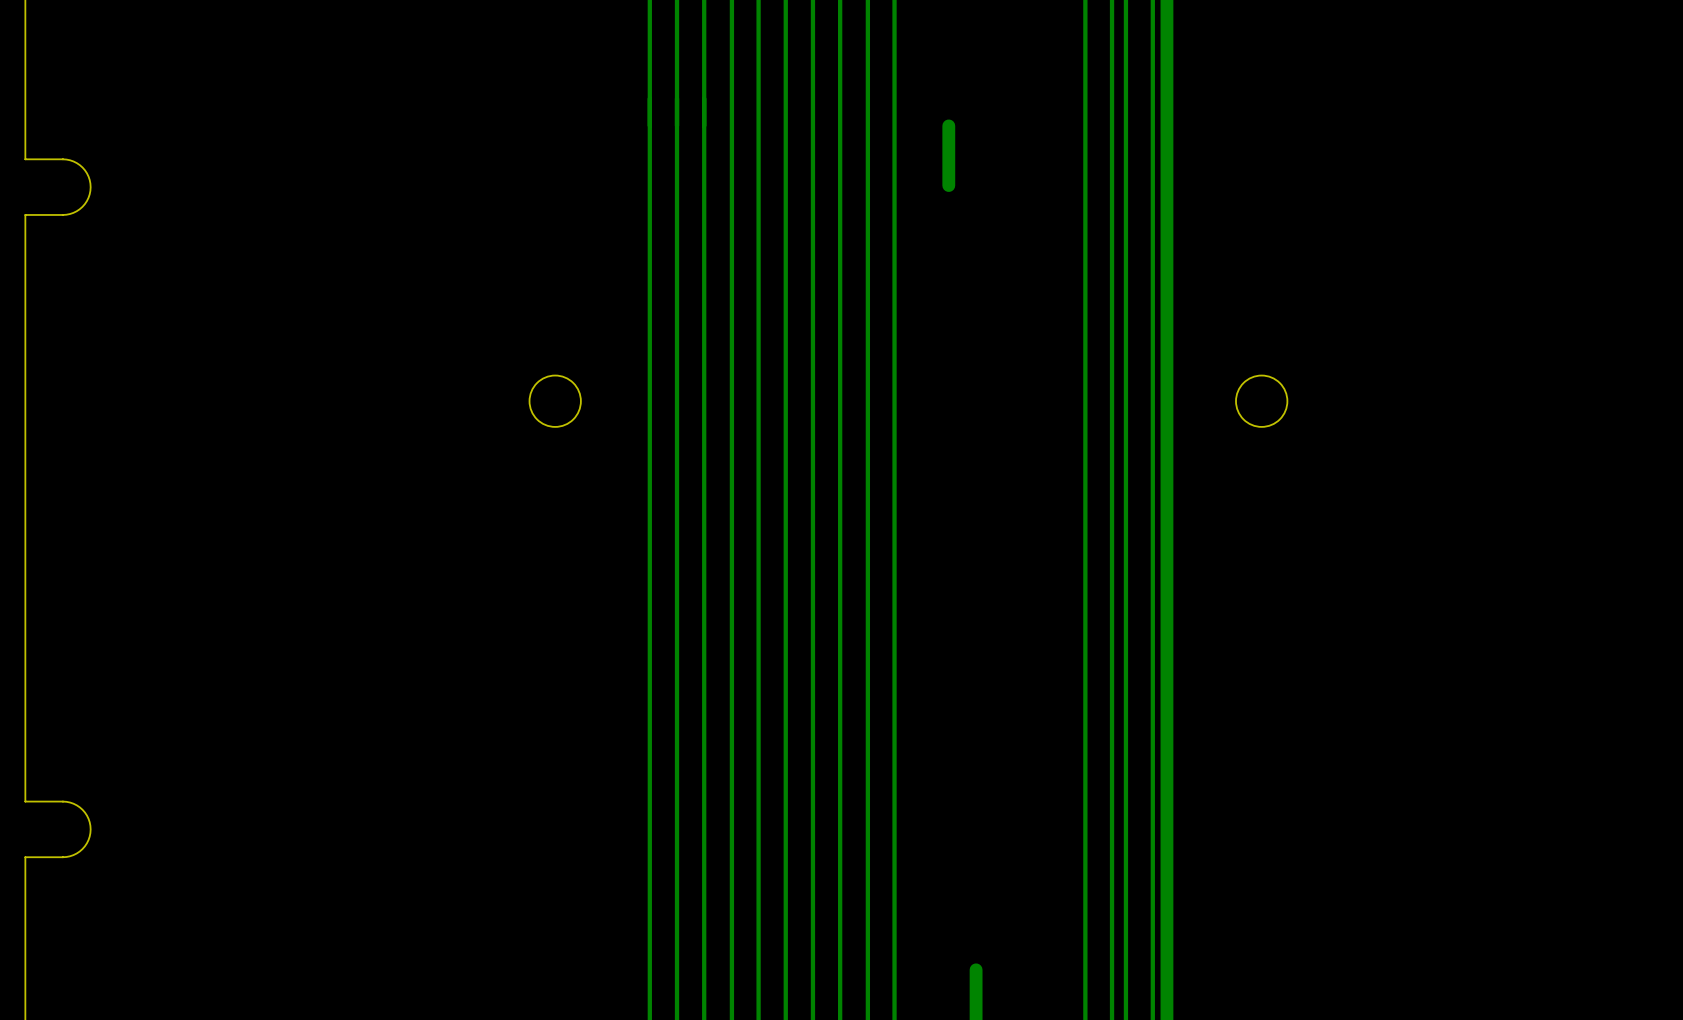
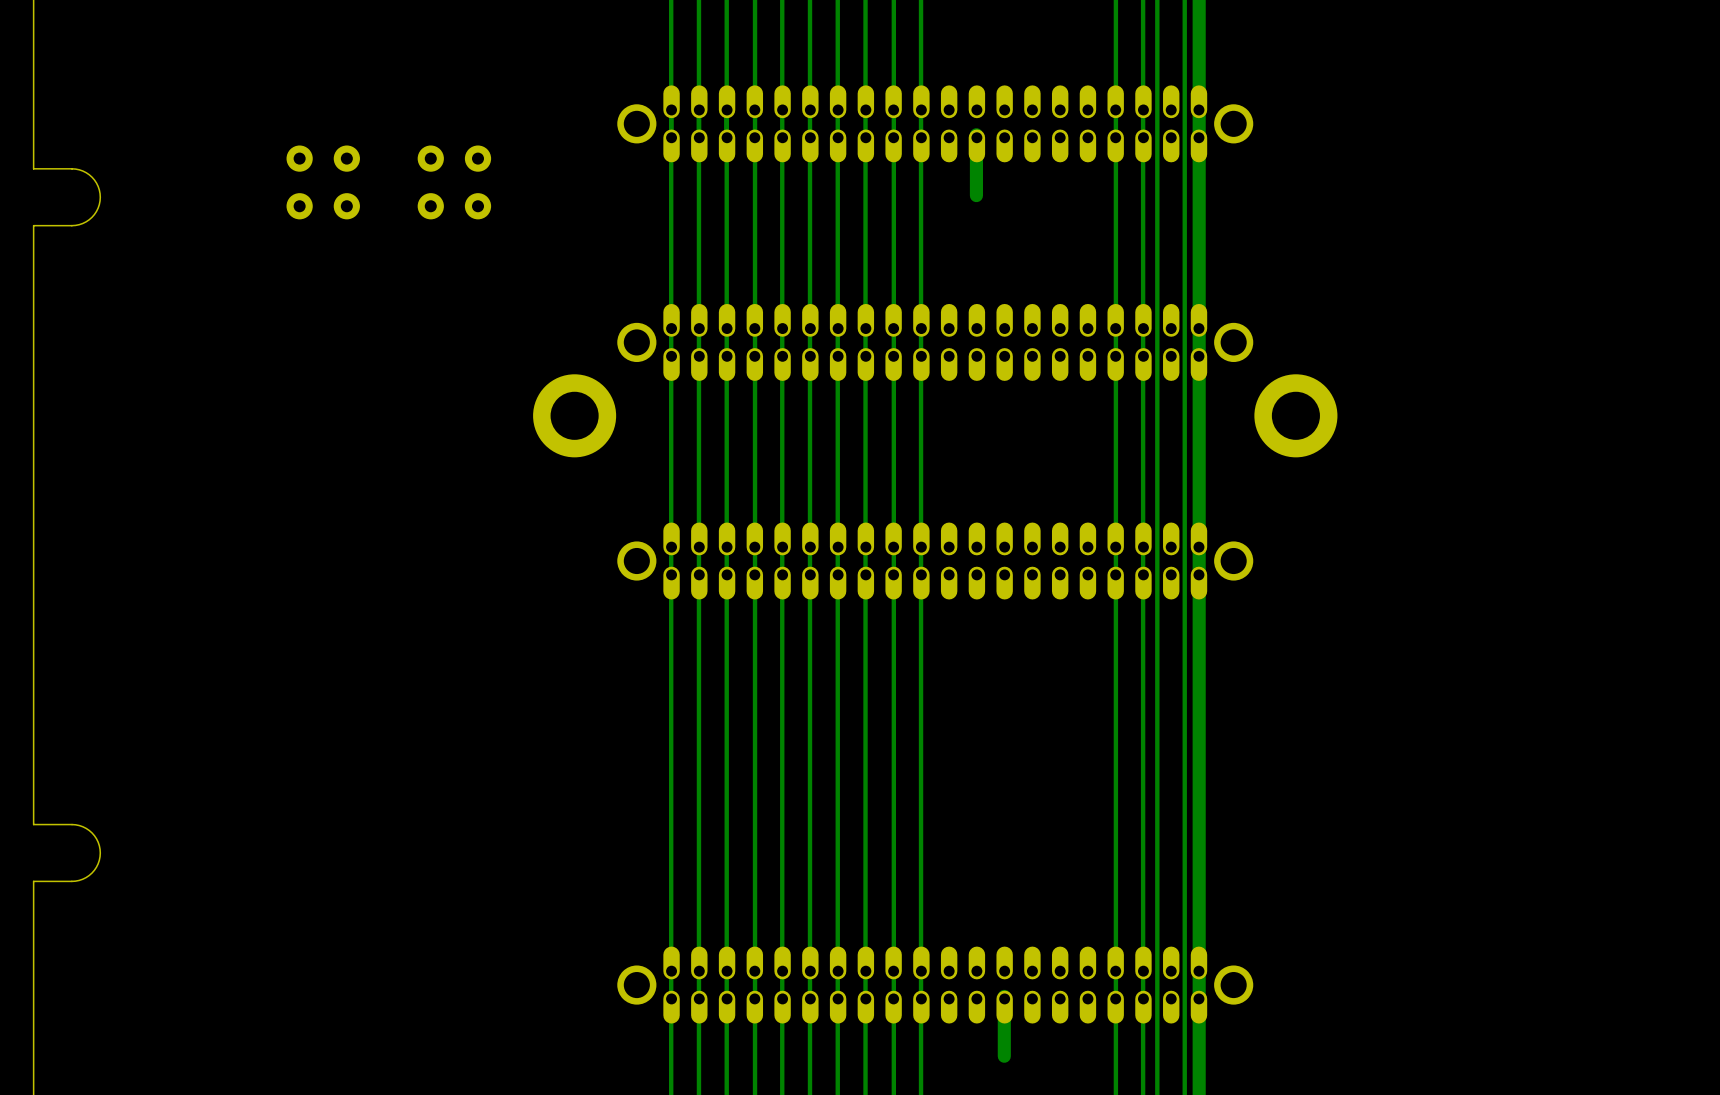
part: none -> (935, 123)
part: none -> (323, 182)
part: none -> (454, 182)
part: none -> (935, 342)
part: none -> (574, 415)
part: none -> (1295, 415)
part: none -> (935, 561)
part: none -> (935, 985)

